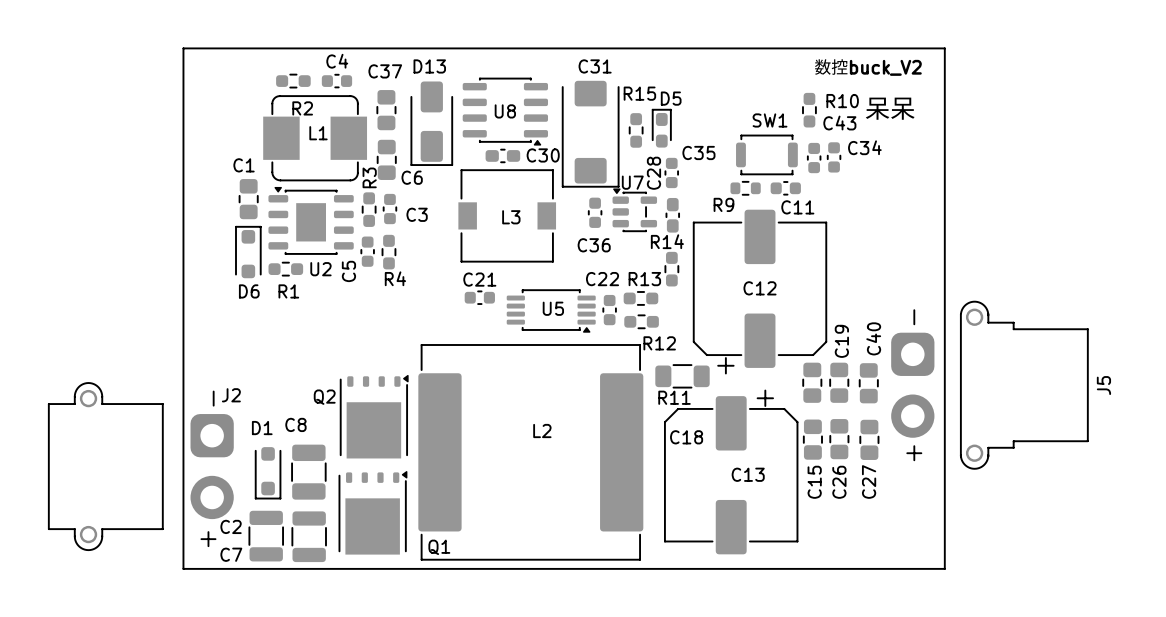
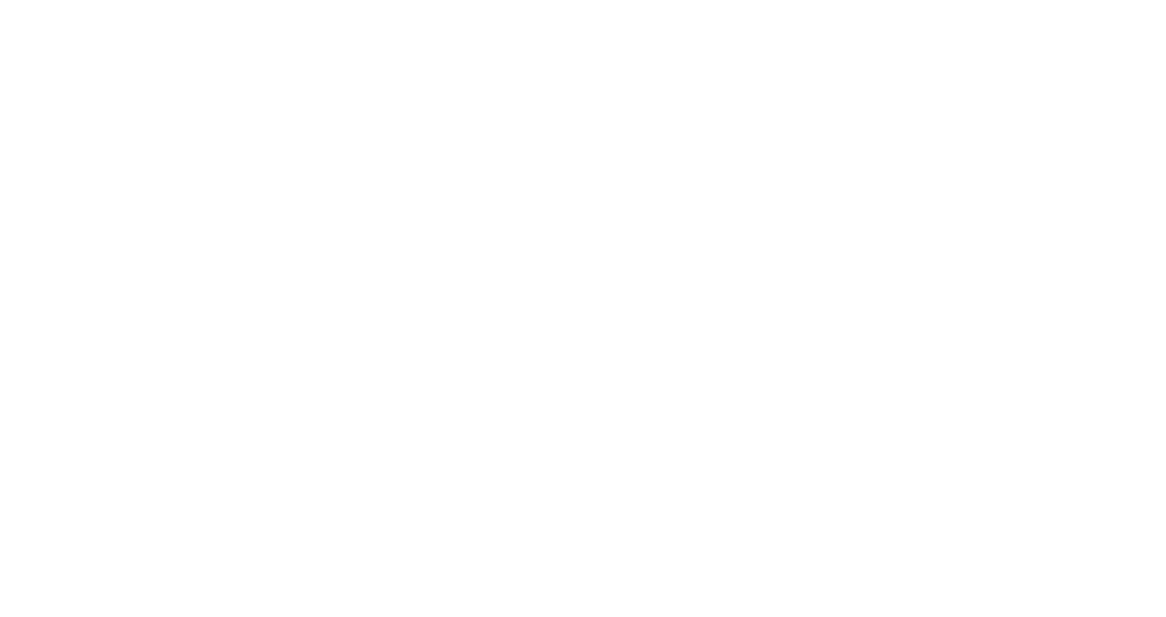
board edge: (183, 48) (944, 48) (944, 568) (183, 568) (183, 48) -> none
text: 数控buck_V2 (867, 67) -> none
R2: (293, 81) -> none
C4: (336, 81) -> none
text: 呆呆 (890, 108) -> none
C37: (386, 110) -> none
R10: (809, 110) -> none
U8: (505, 111) -> none
D13: (431, 123) -> none
D5: (661, 128) -> none
R15: (636, 130) -> none
C31: (590, 134) -> none
L1: (315, 138) -> none
SW1: (766, 154) -> none
C30: (502, 155) -> none
C34: (834, 157) -> none
C43: (814, 158) -> none
C6: (386, 159) -> none
C35: (671, 172) -> none
R9: (745, 188) -> none
C11: (785, 188) -> none
C1: (248, 199) -> none
R3: (369, 209) -> none
C3: (389, 209) -> none
U7: (634, 210) -> none
C36: (595, 212) -> none
L3: (507, 215) -> none
C28: (672, 215) -> none
U2: (311, 220) -> none
C5: (367, 251) -> none
D6: (248, 252) -> none
R4: (388, 252) -> none
R1: (285, 269) -> none
R14: (671, 269) -> none
C12: (760, 291) -> none
C21: (479, 297) -> none
R13: (640, 298) -> none
C22: (609, 310) -> none
U5: (551, 311) -> none
R12: (641, 321) -> none
R11: (682, 376) -> none
C18: (812, 382) -> none
C19: (839, 382) -> none
C40: (868, 383) -> none
J5: (989, 385) -> none
Q2: (374, 416) -> none
C15: (812, 439) -> none
C26: (839, 439) -> none
C27: (869, 439) -> none
L2: (530, 452) -> none
J2: (140, 466) -> none
C8: (308, 472) -> none
C13: (731, 472) -> none
D1: (268, 473) -> none
Q1: (373, 512) -> none
C7: (266, 536) -> none
C2: (309, 536) -> none

